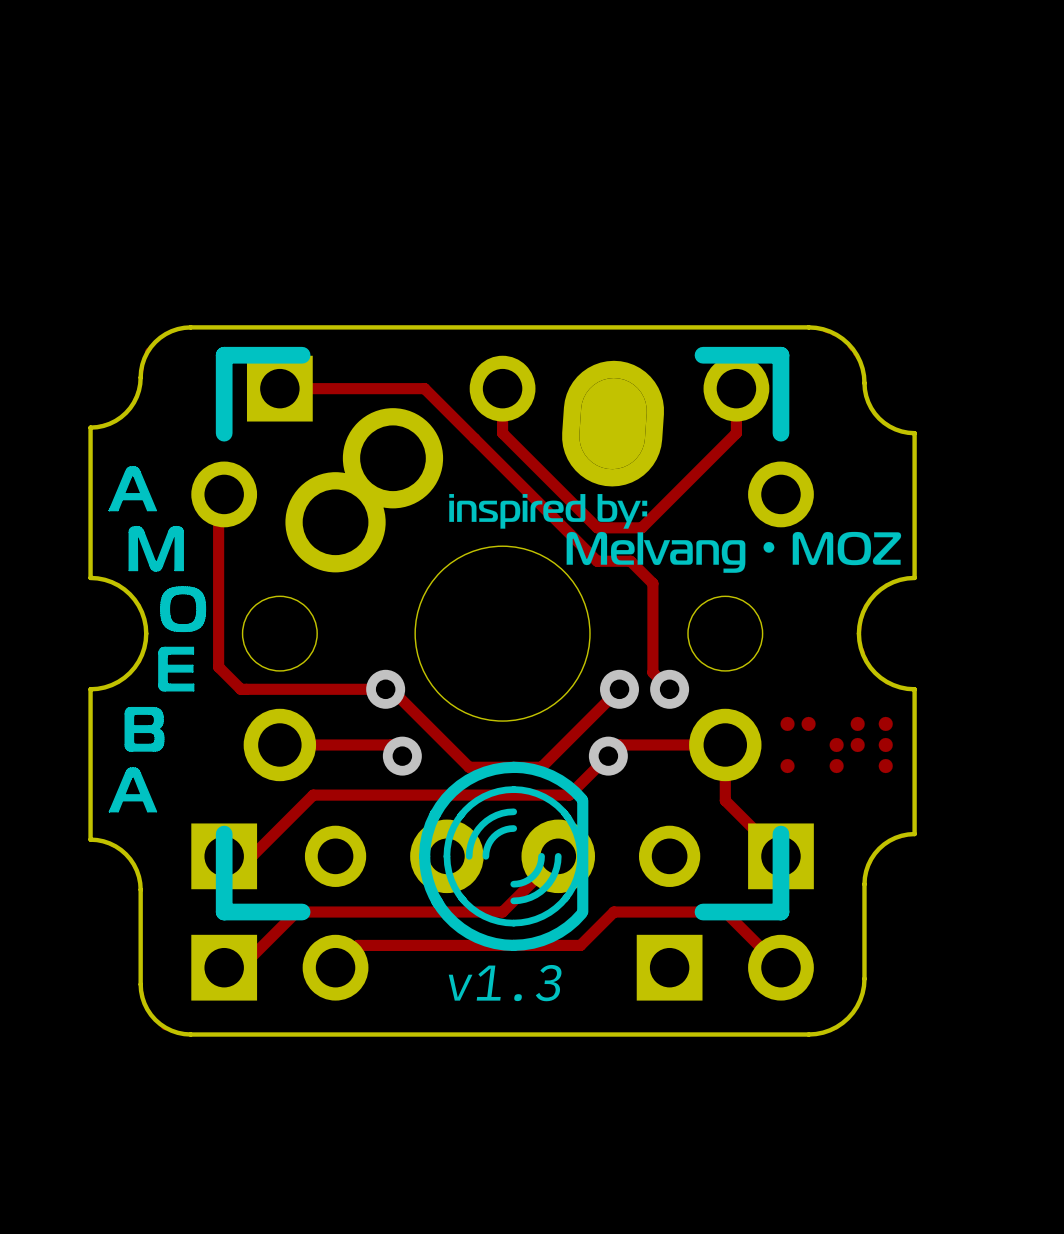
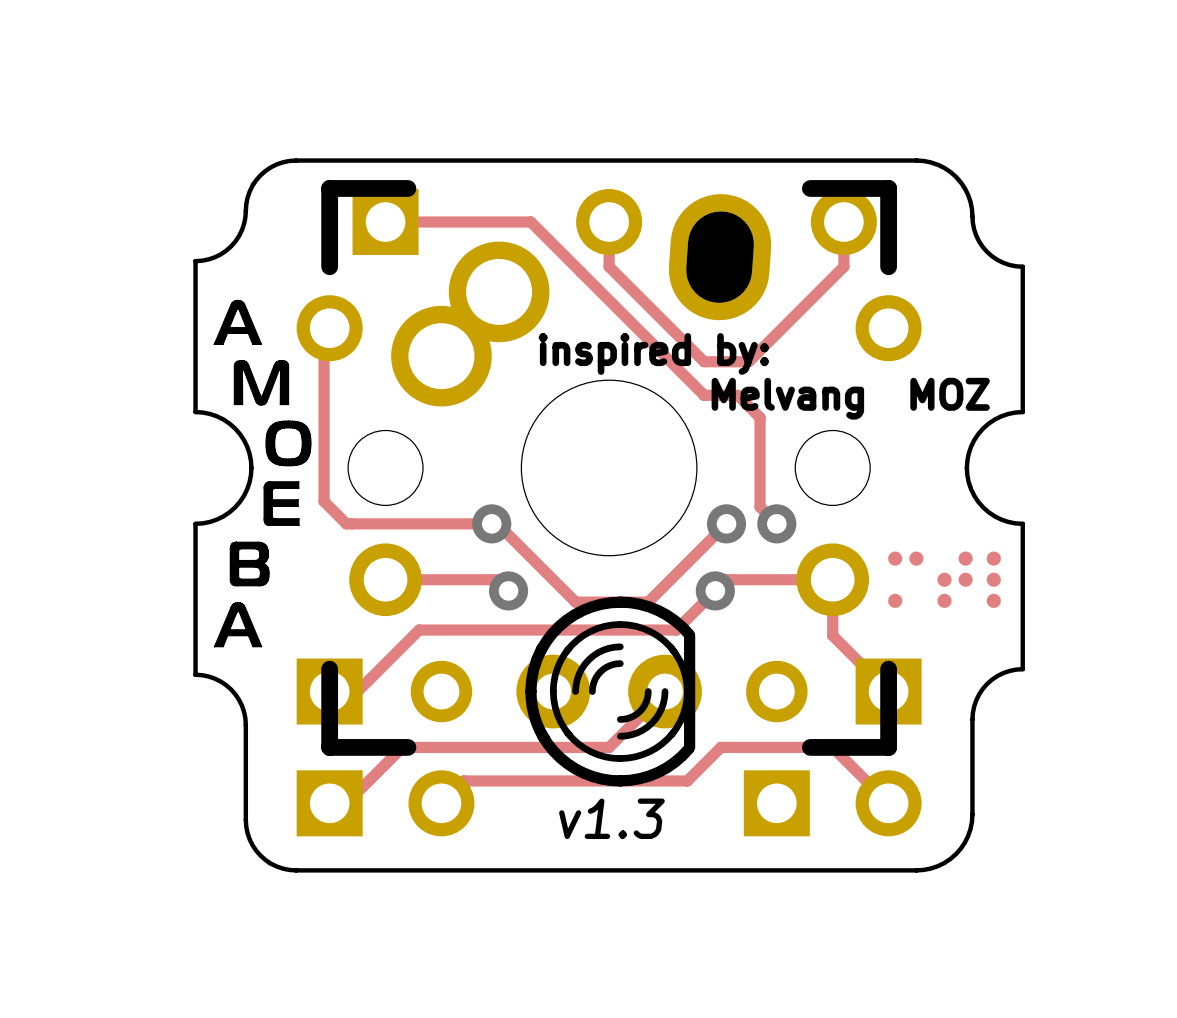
drawing: [449, 493, 902, 573] -> none
text: none -> inspired by: (653, 353)
text: none -> Melvang MOZ (850, 398)

